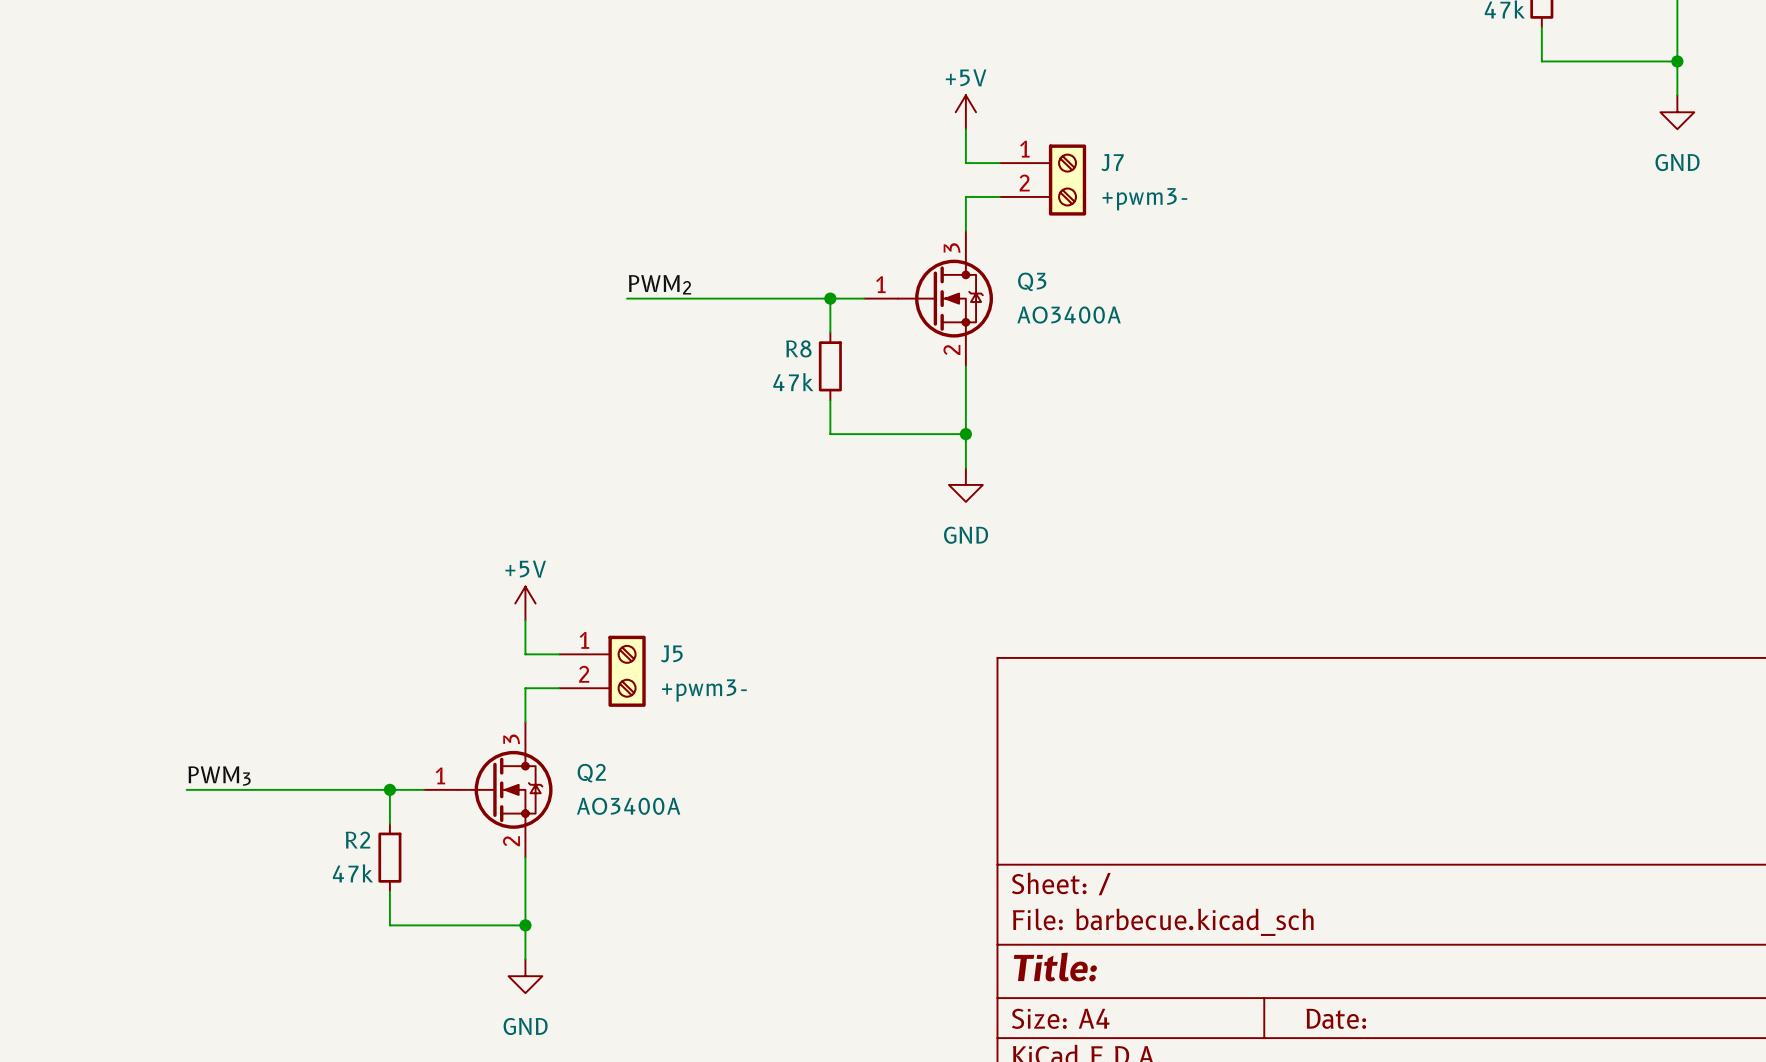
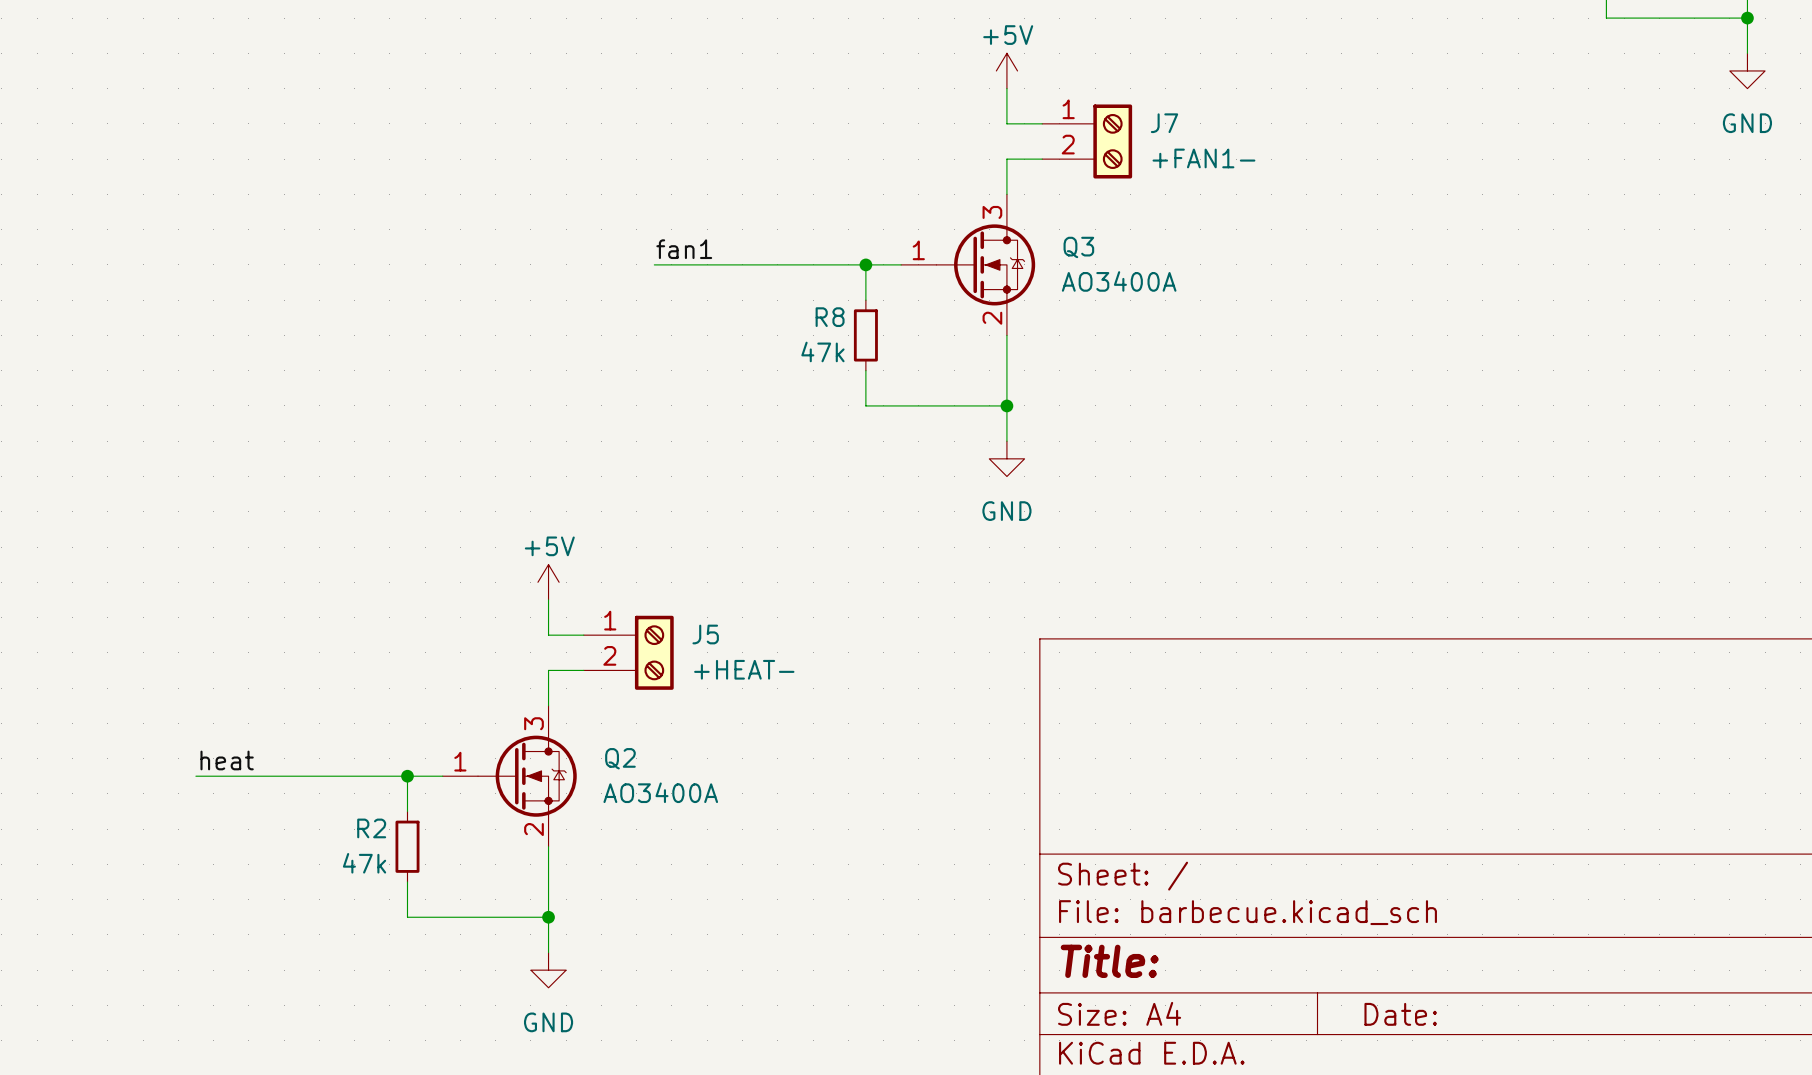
J7 value: +pwm3- (1144, 199) -> +FAN1- (1203, 158)
label: PWM2 (659, 284) -> fan1 (684, 249)
J5 value: +pwm3- (704, 690) -> +HEAT- (744, 669)
label: PWM3 (219, 776) -> heat (227, 760)

